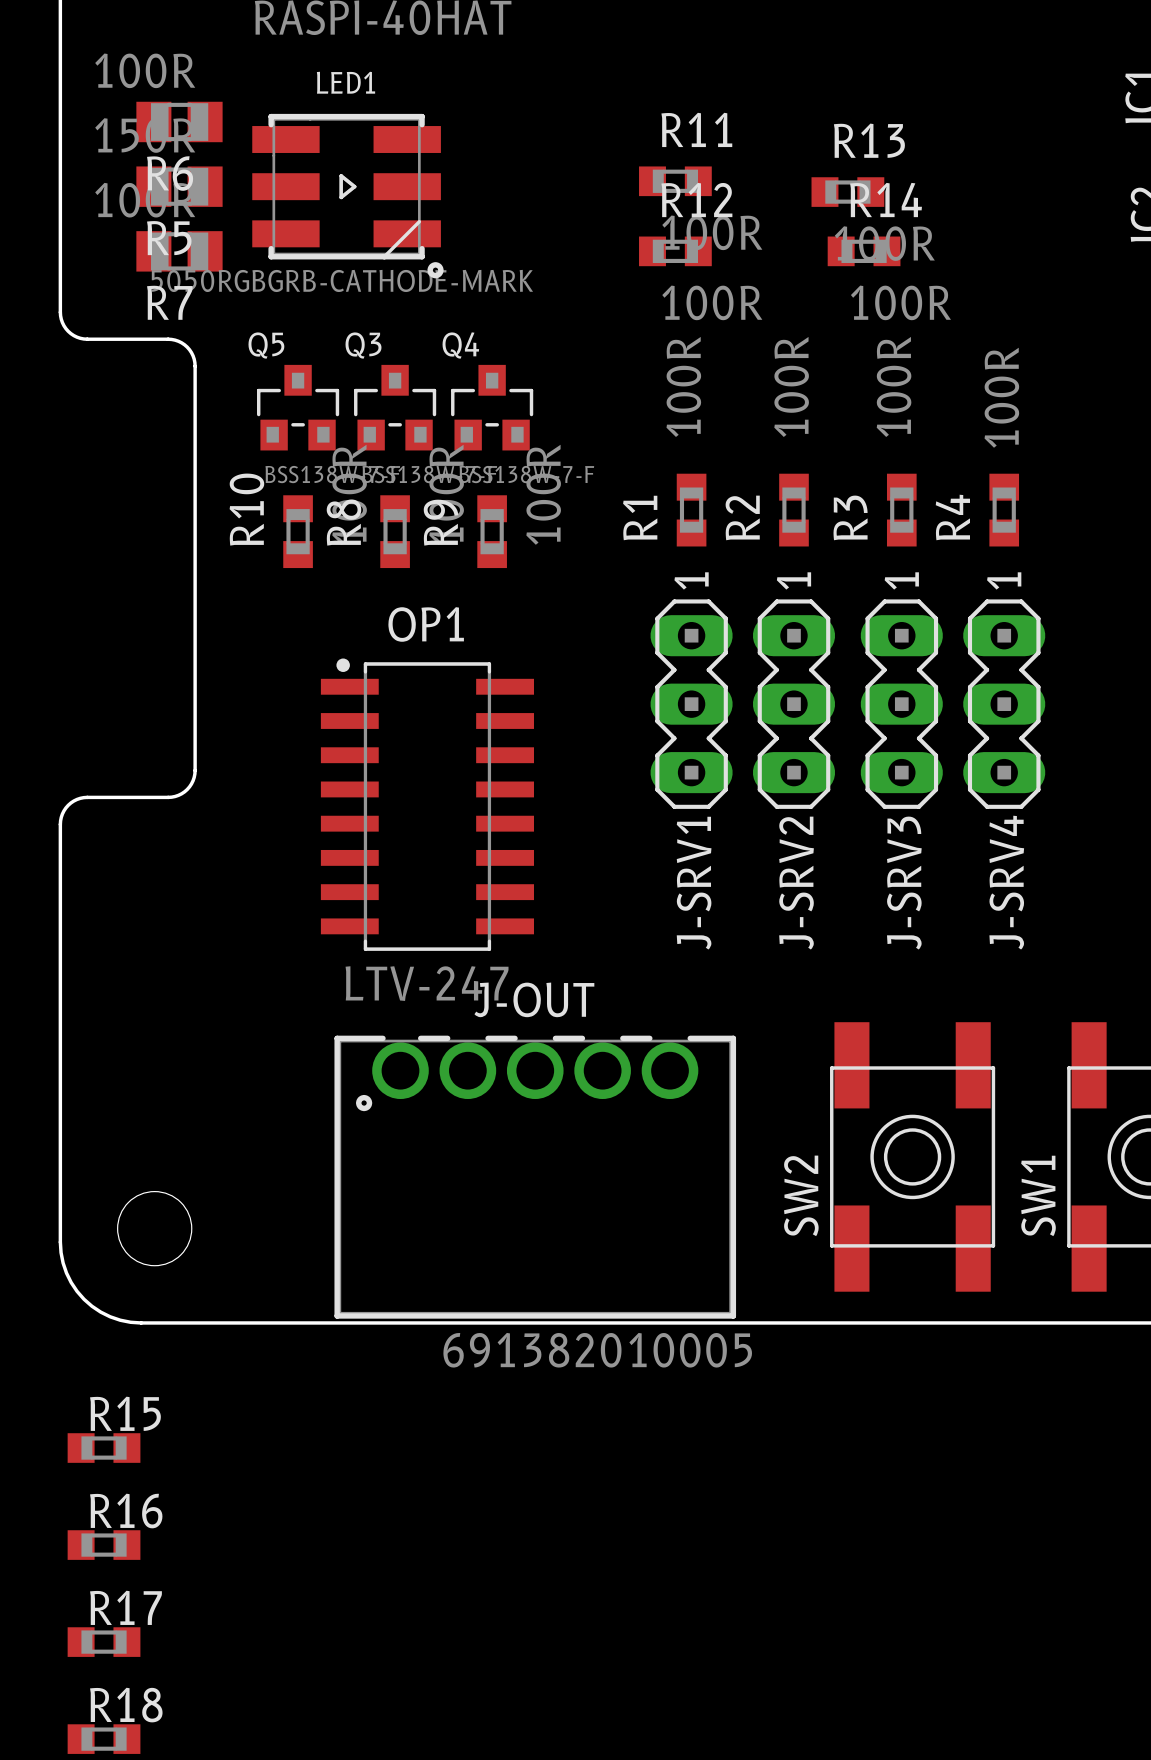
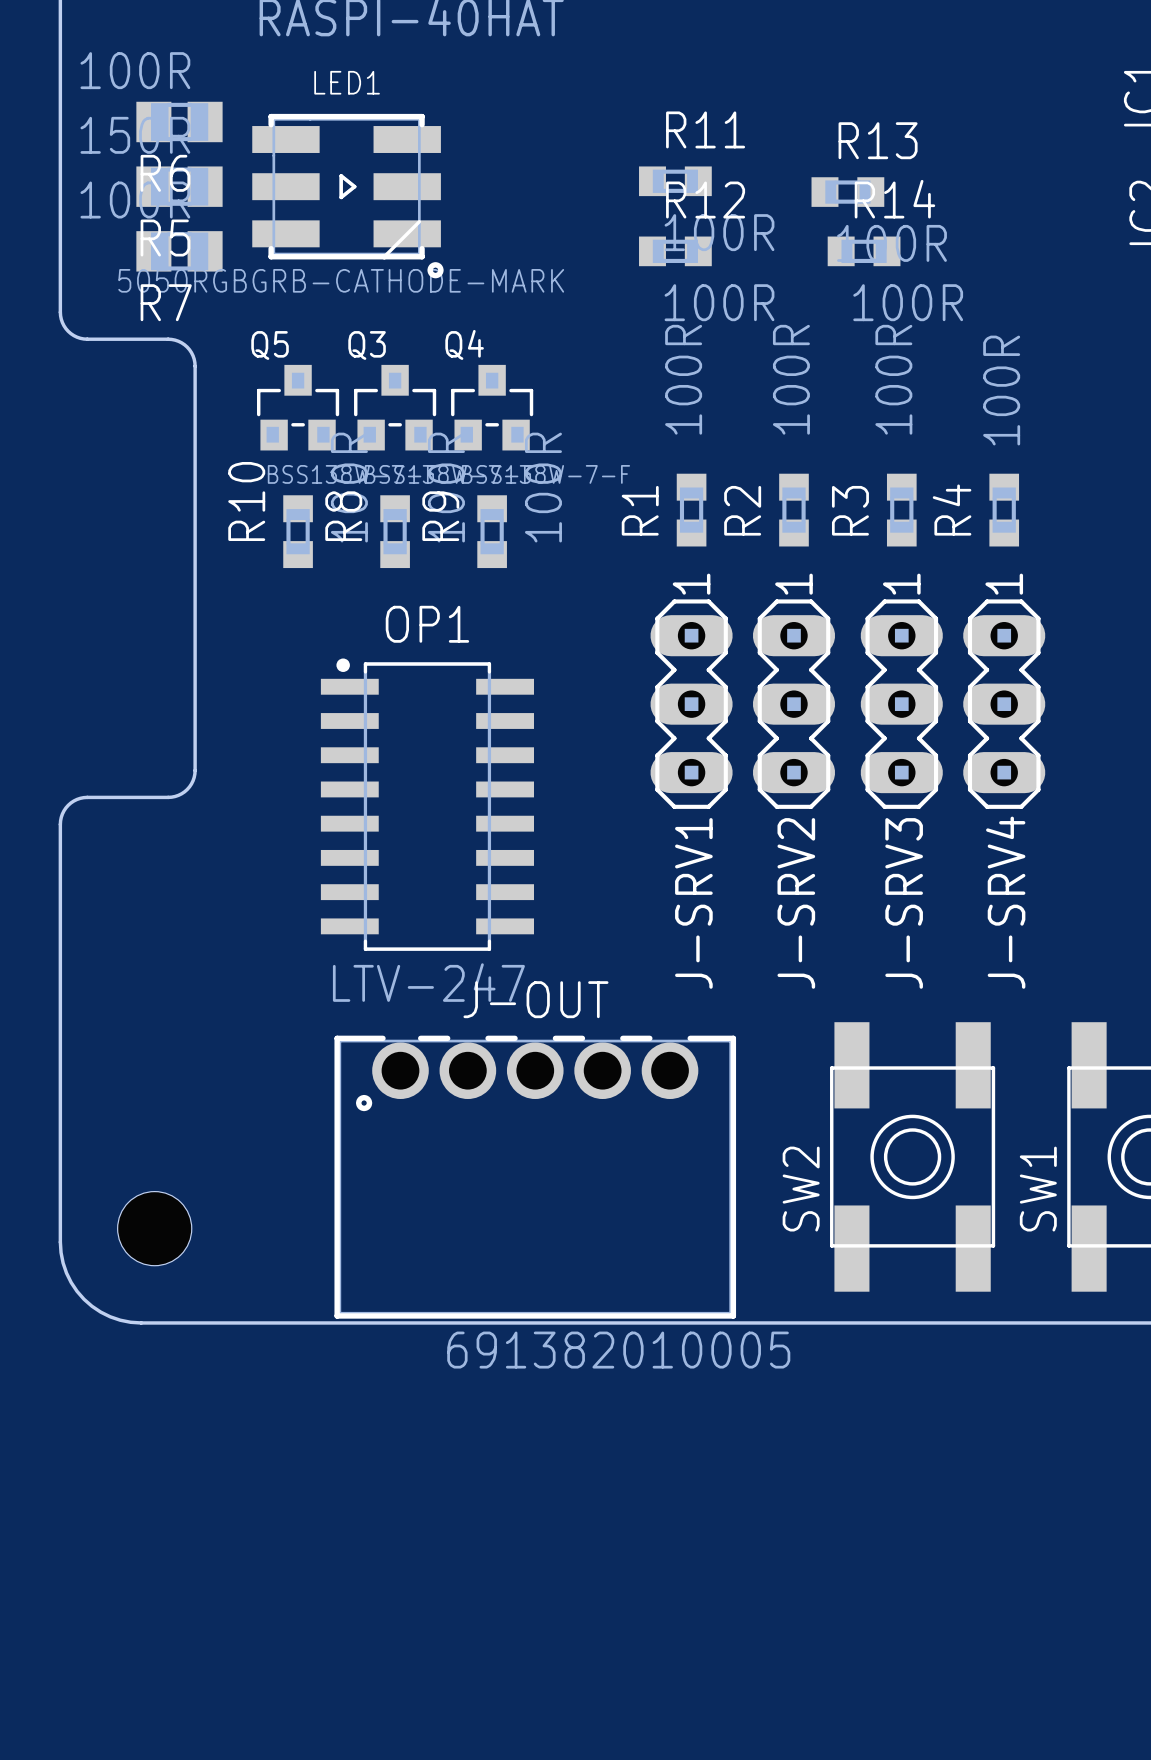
R15: (104, 1448) -> none
R16: (104, 1545) -> none
R17: (104, 1642) -> none
R18: (104, 1739) -> none

